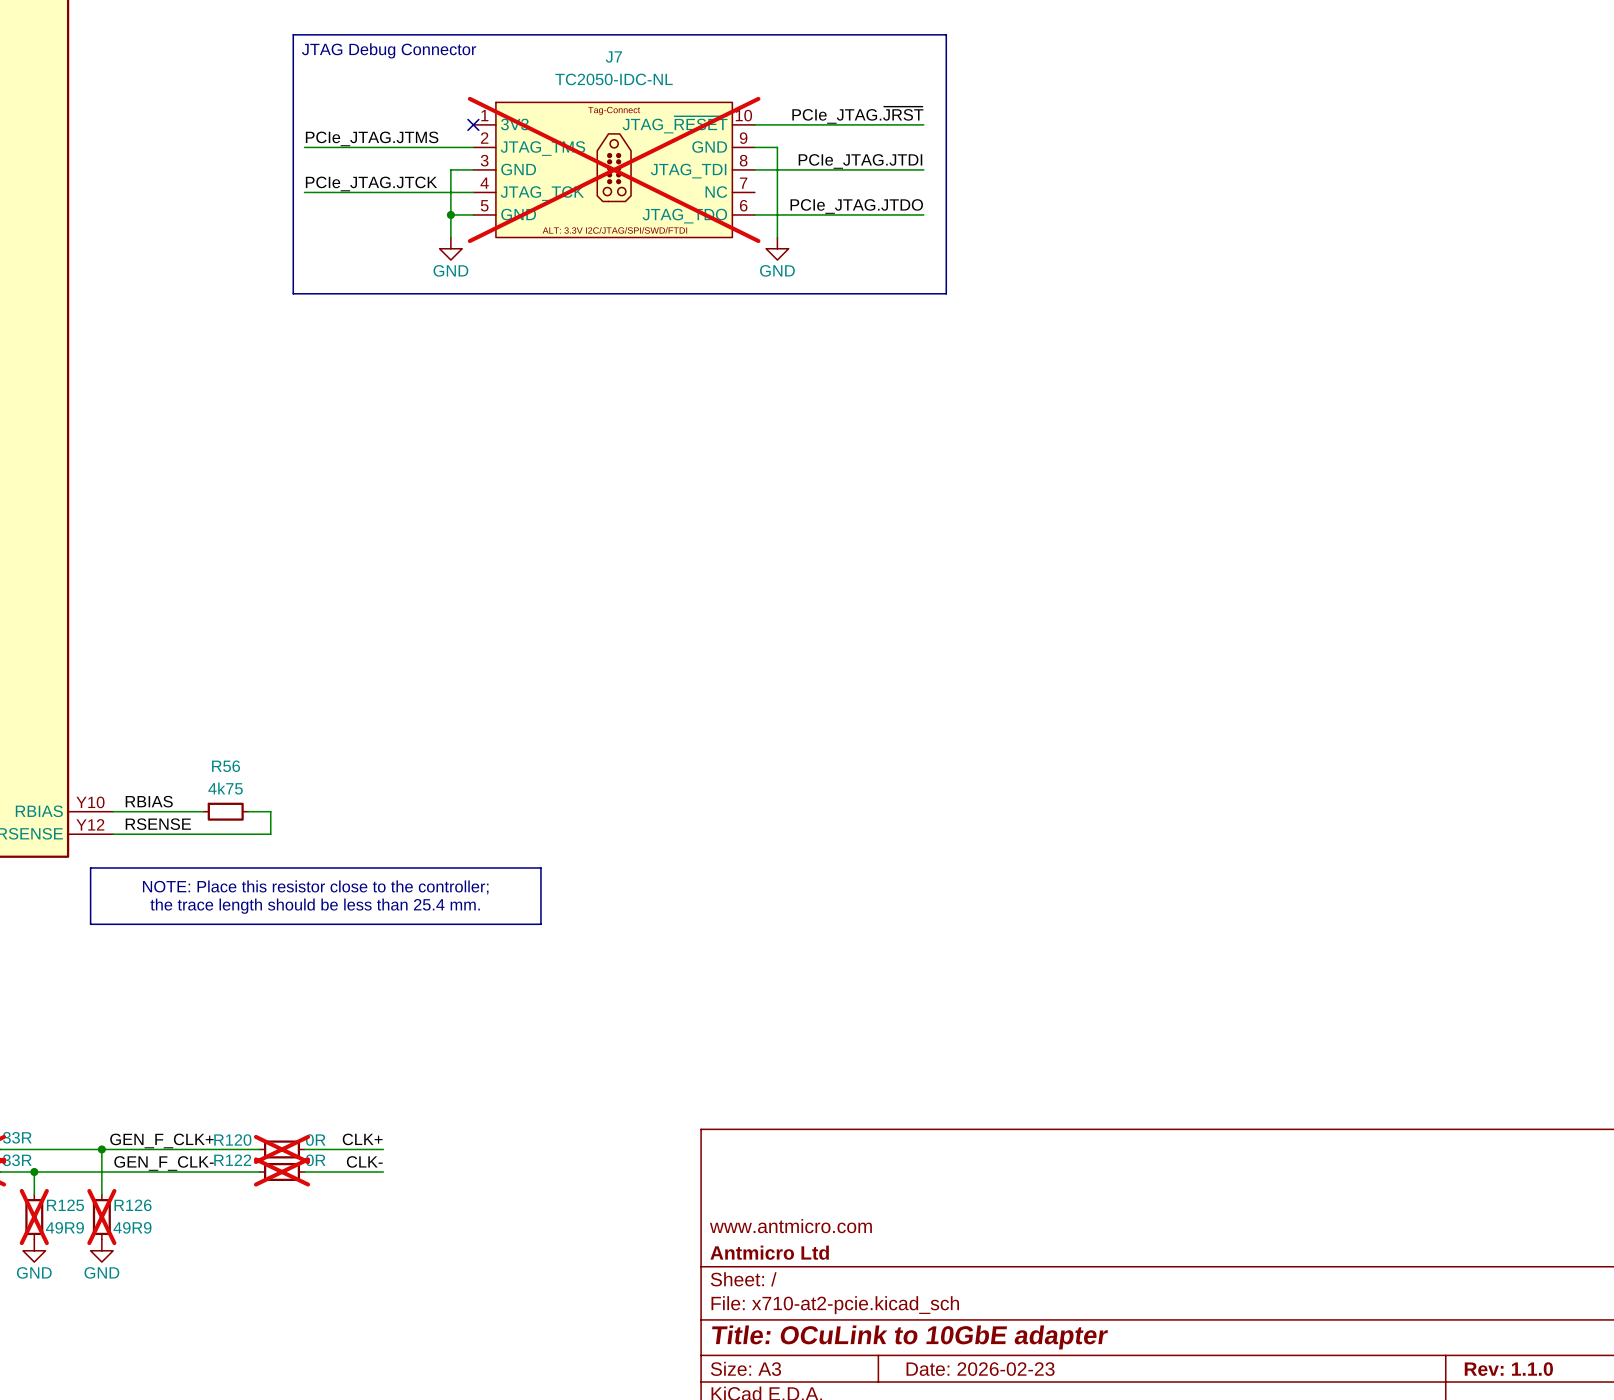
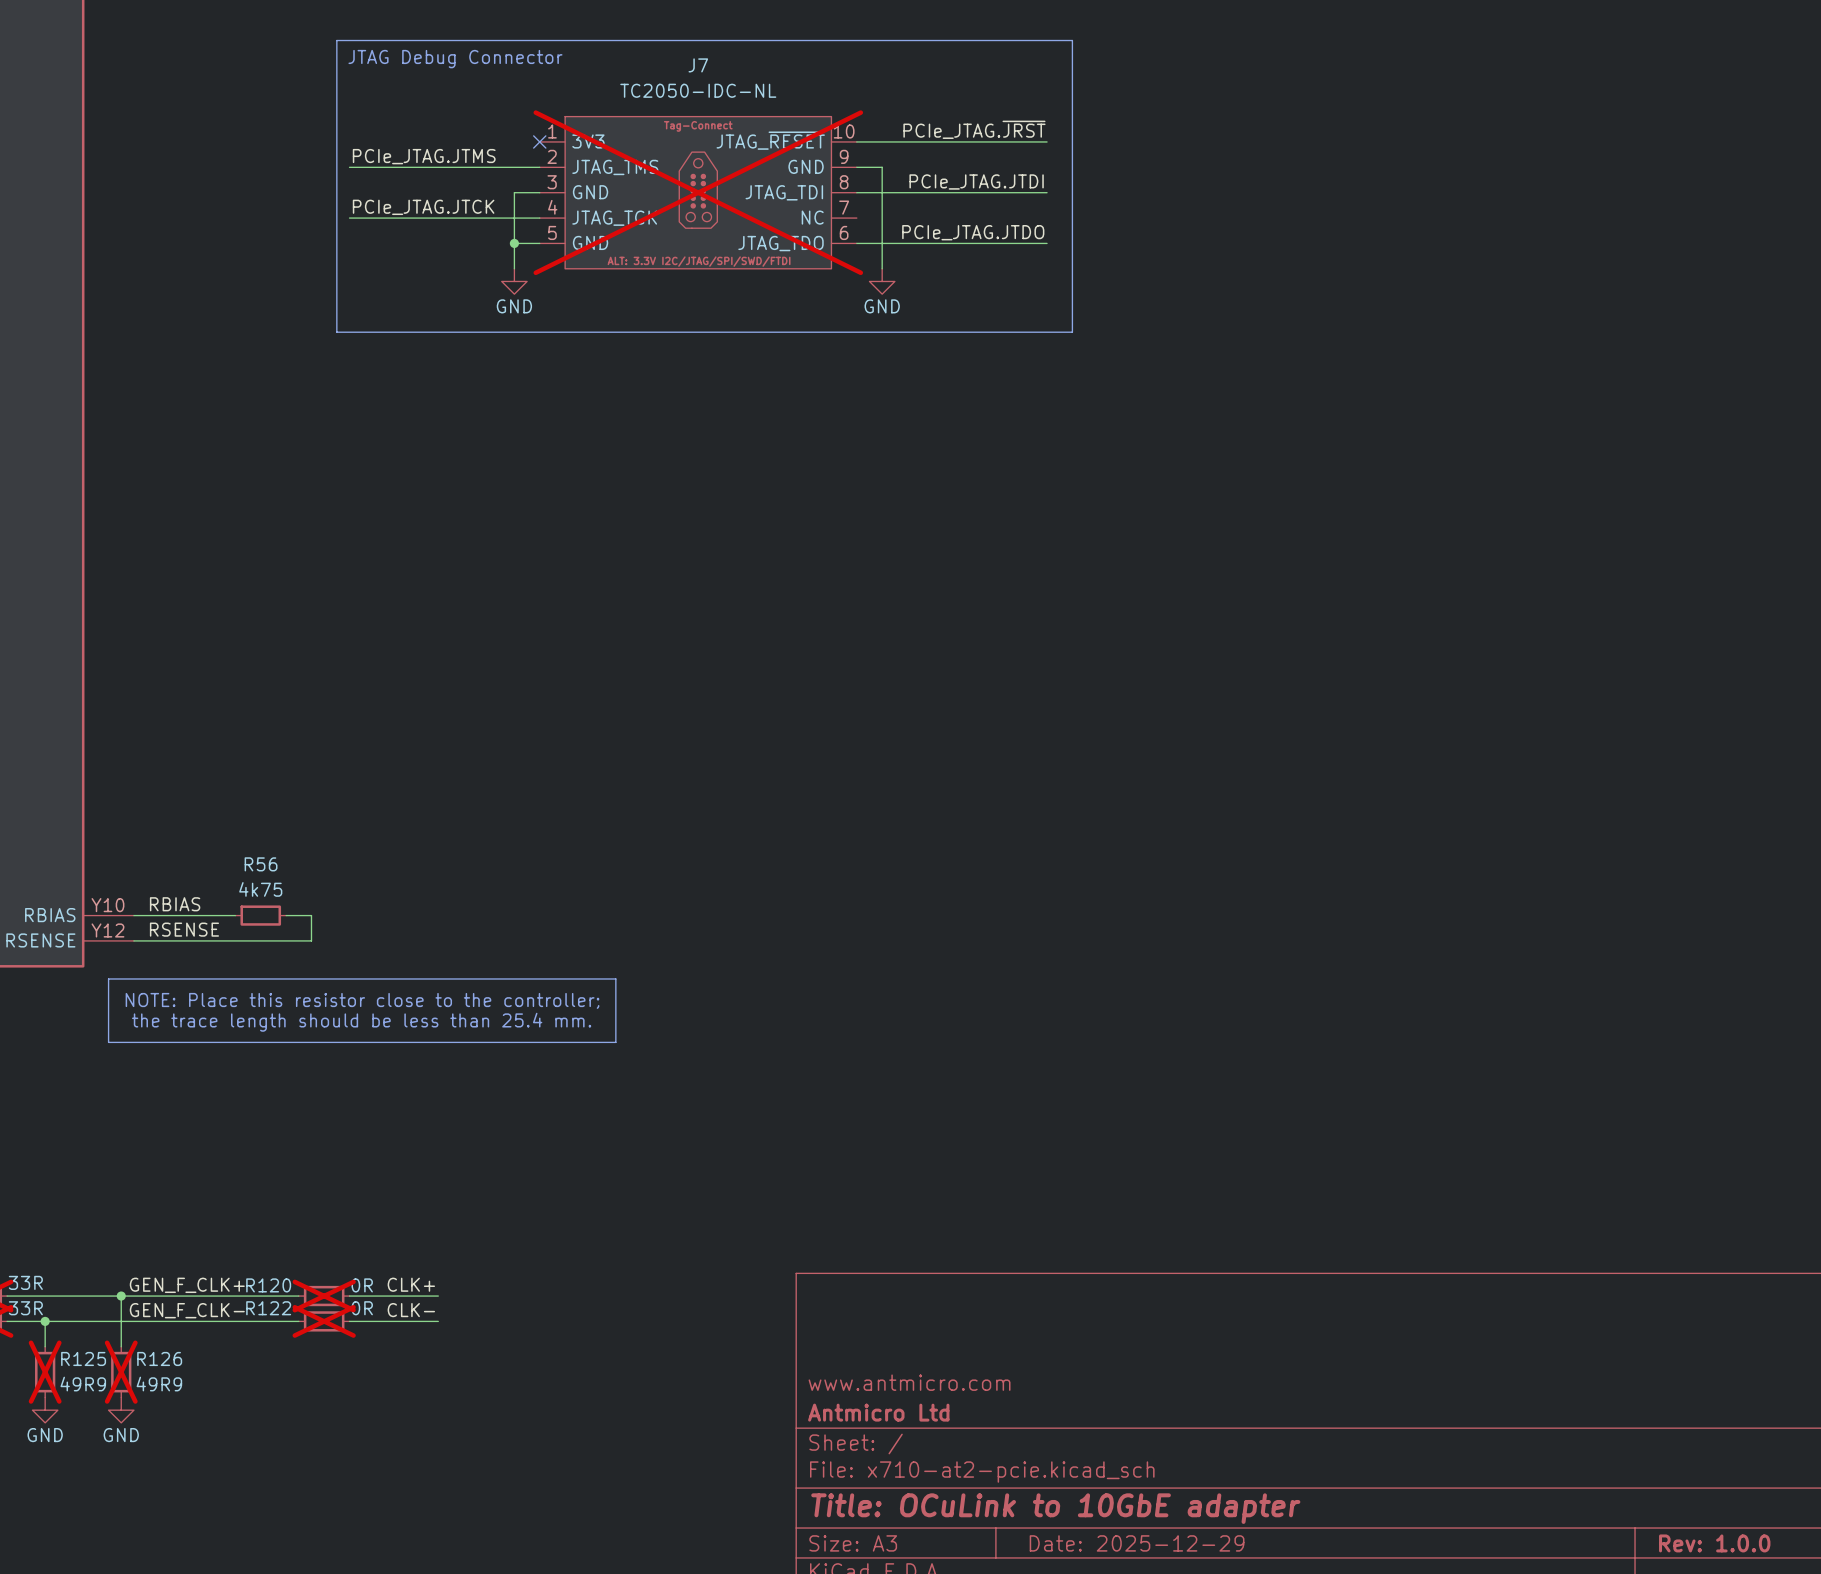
title block: Date: 2026-02-23 (980, 1369) -> Date: 2025-12-29 (1137, 1543)
title block: Rev: 1.1.0 (1508, 1369) -> Rev: 1.0.0 (1714, 1543)

